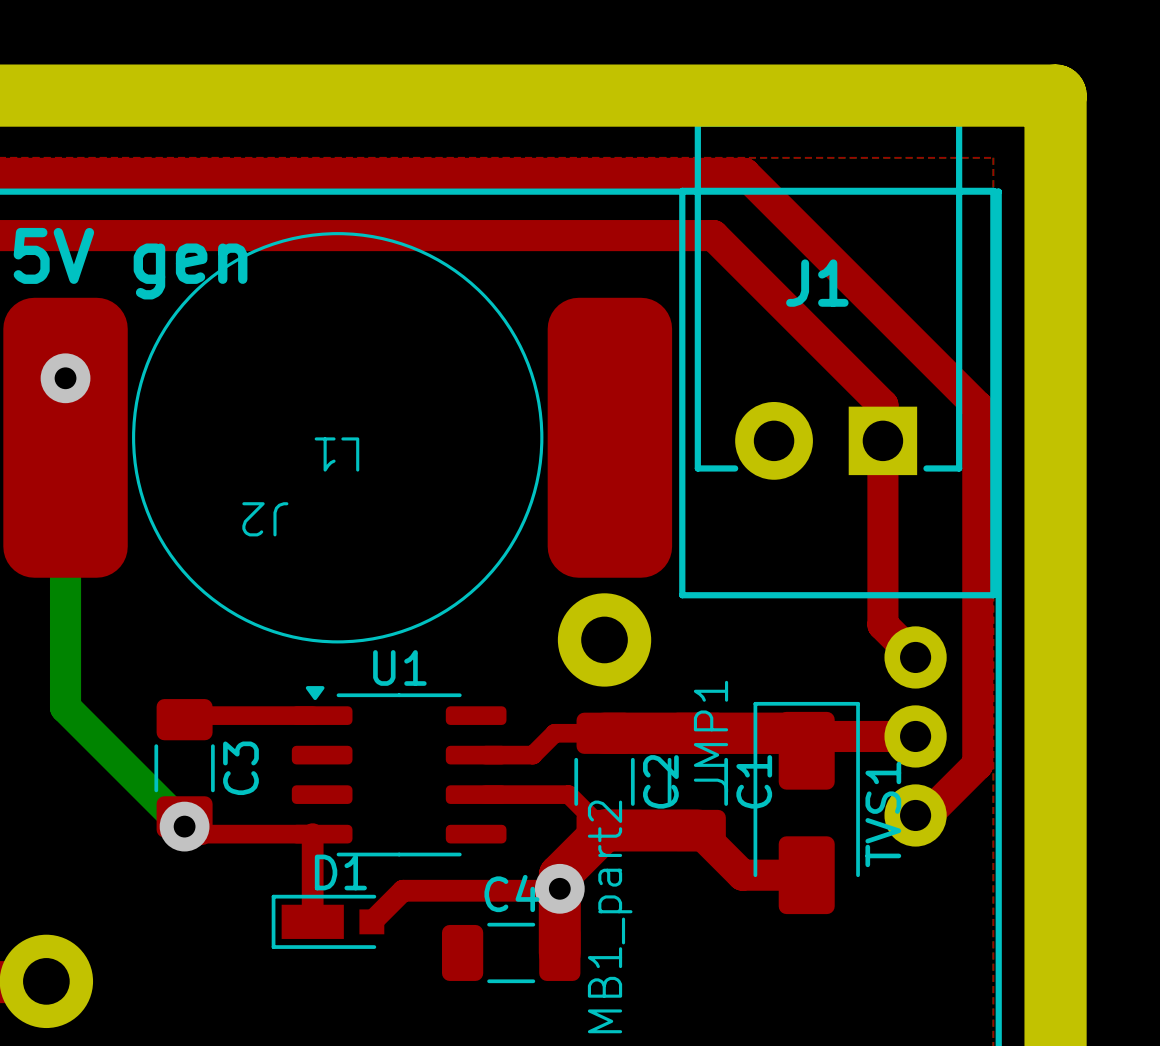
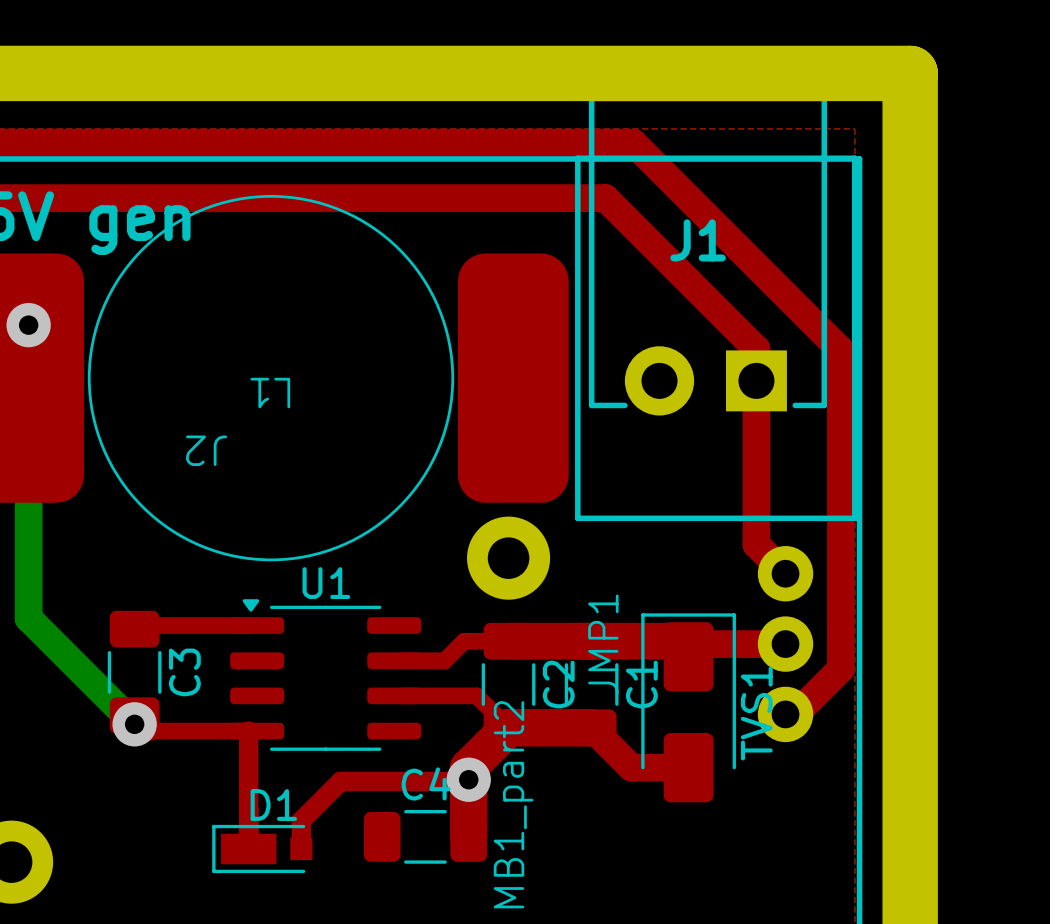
top track: (415, 890) (402, 890) (371, 921) -> (340, 781) (301, 820) (301, 848)
D1 position: (327, 921) -> (262, 848)

